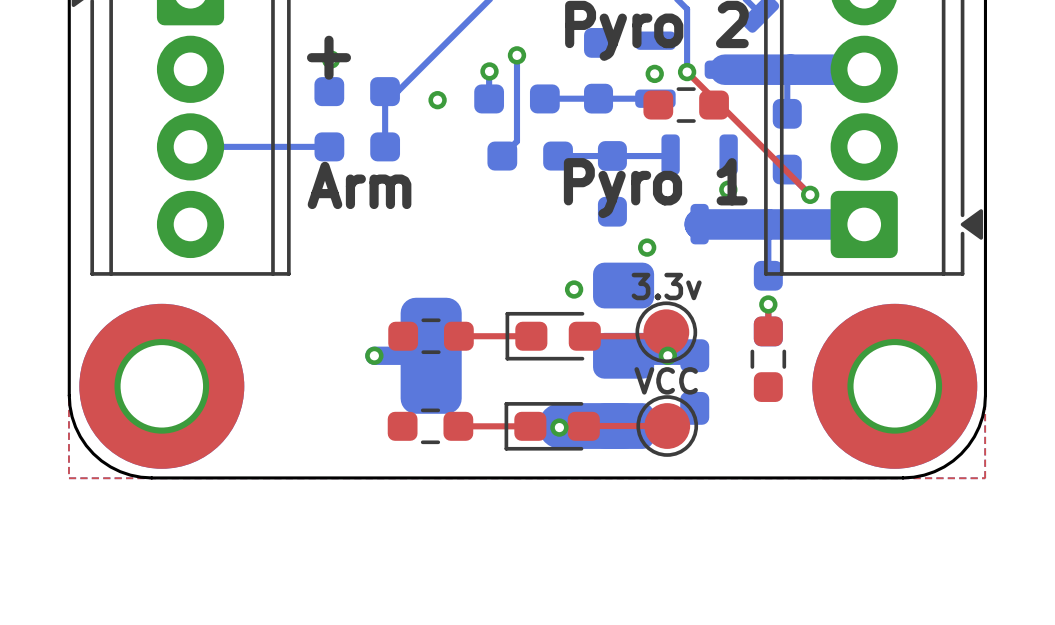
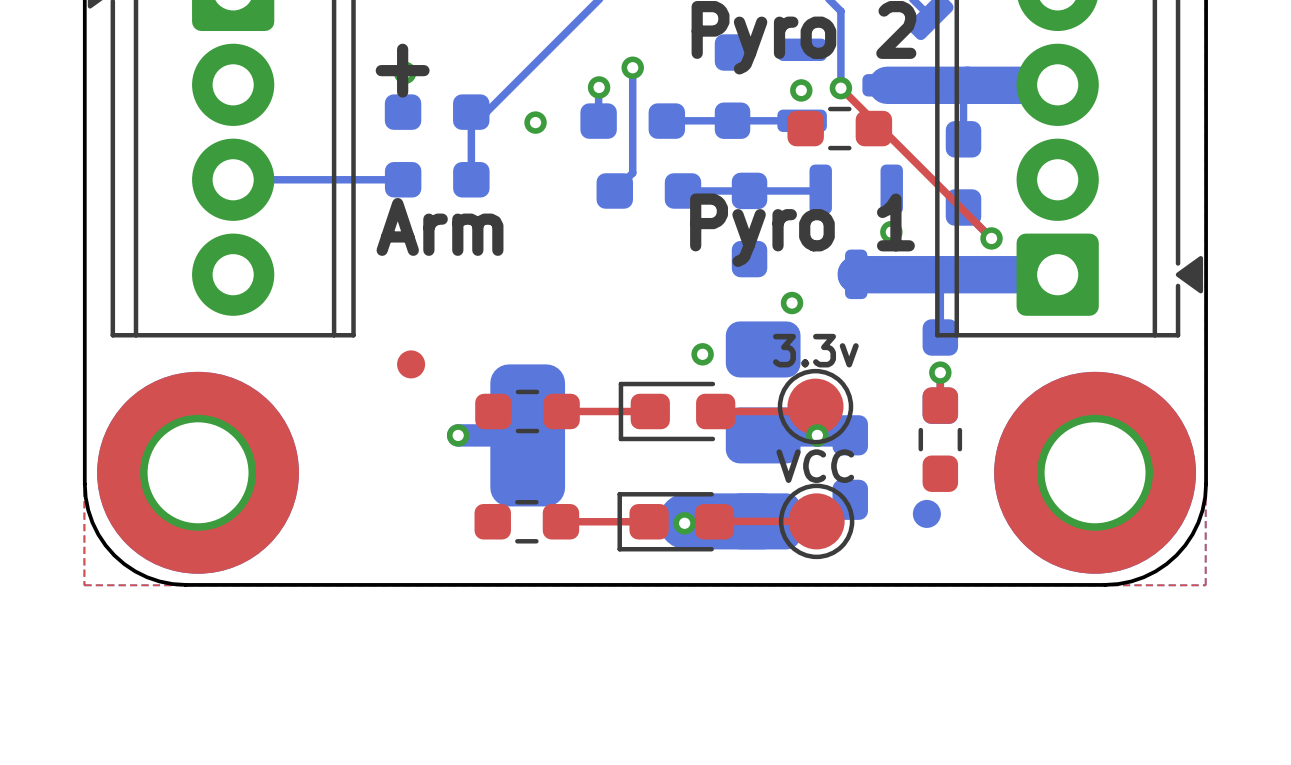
part: none -> (411, 364)
part: none -> (926, 513)

